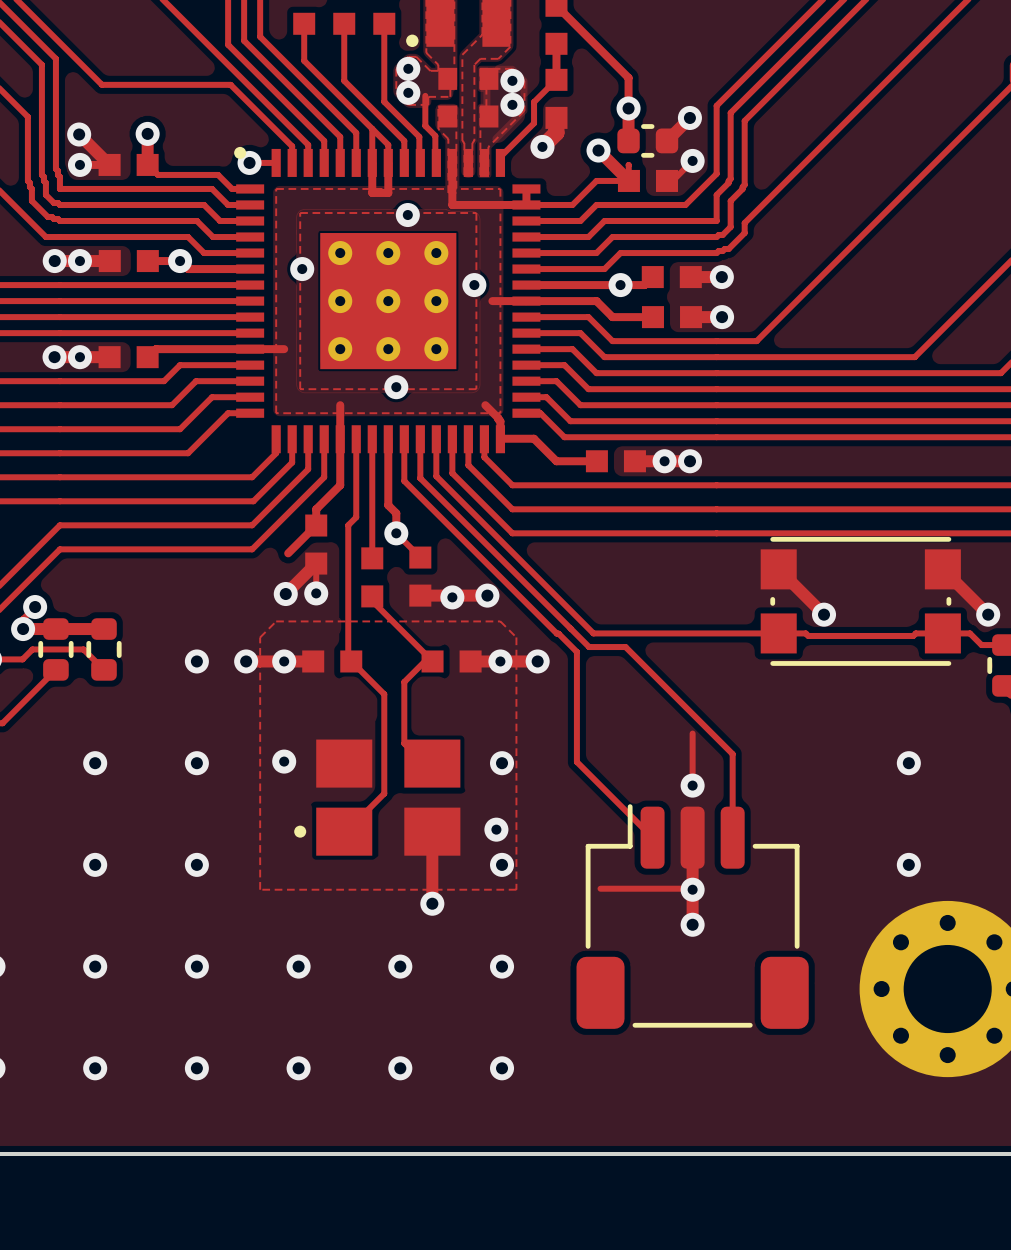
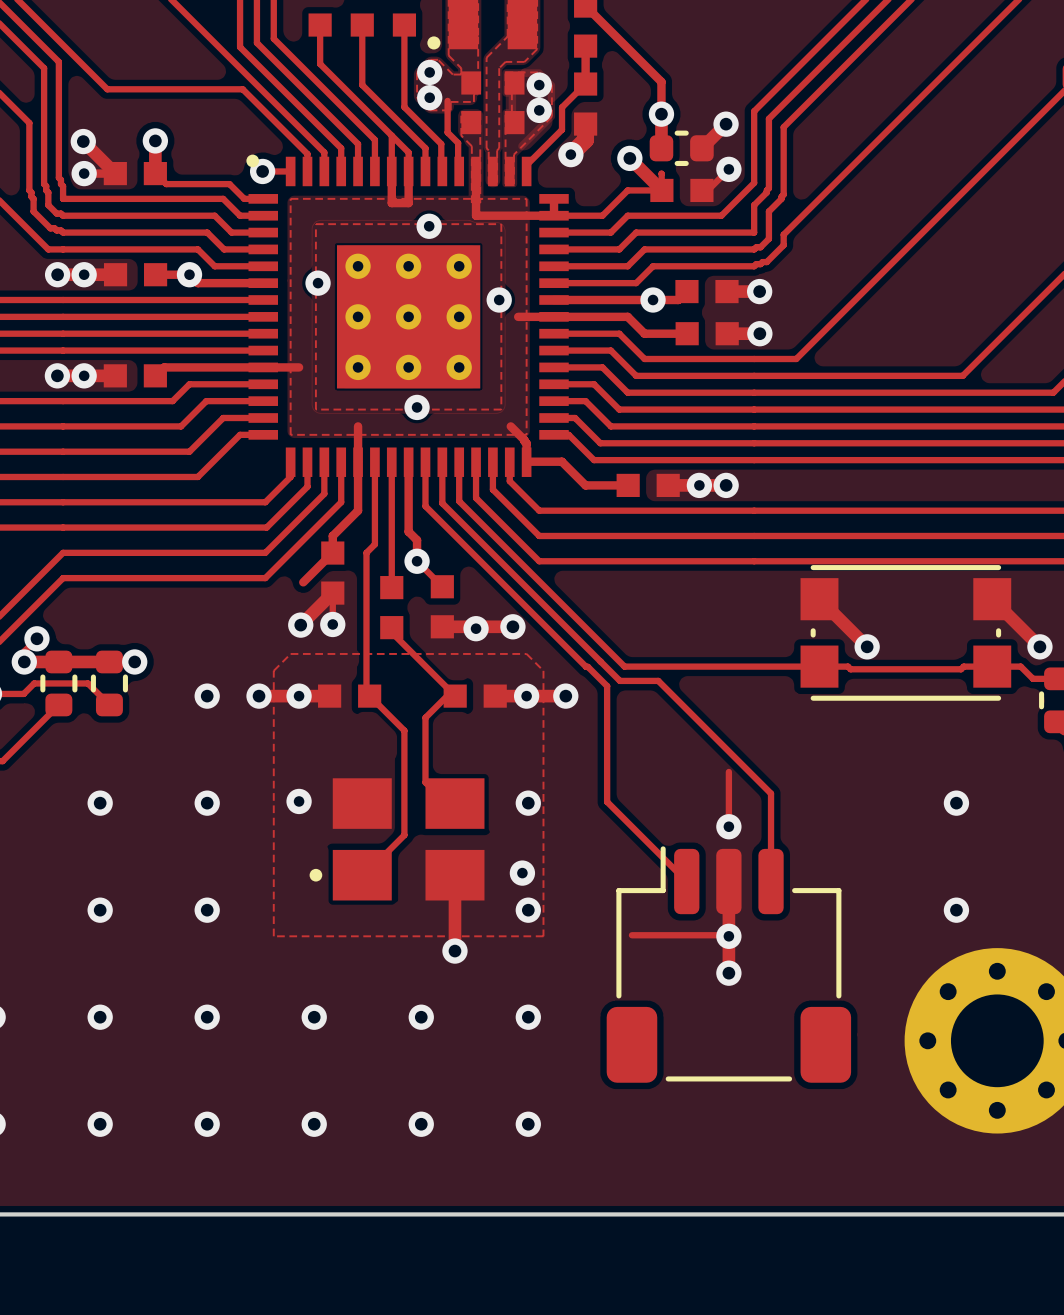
via: none -> (134, 661)

